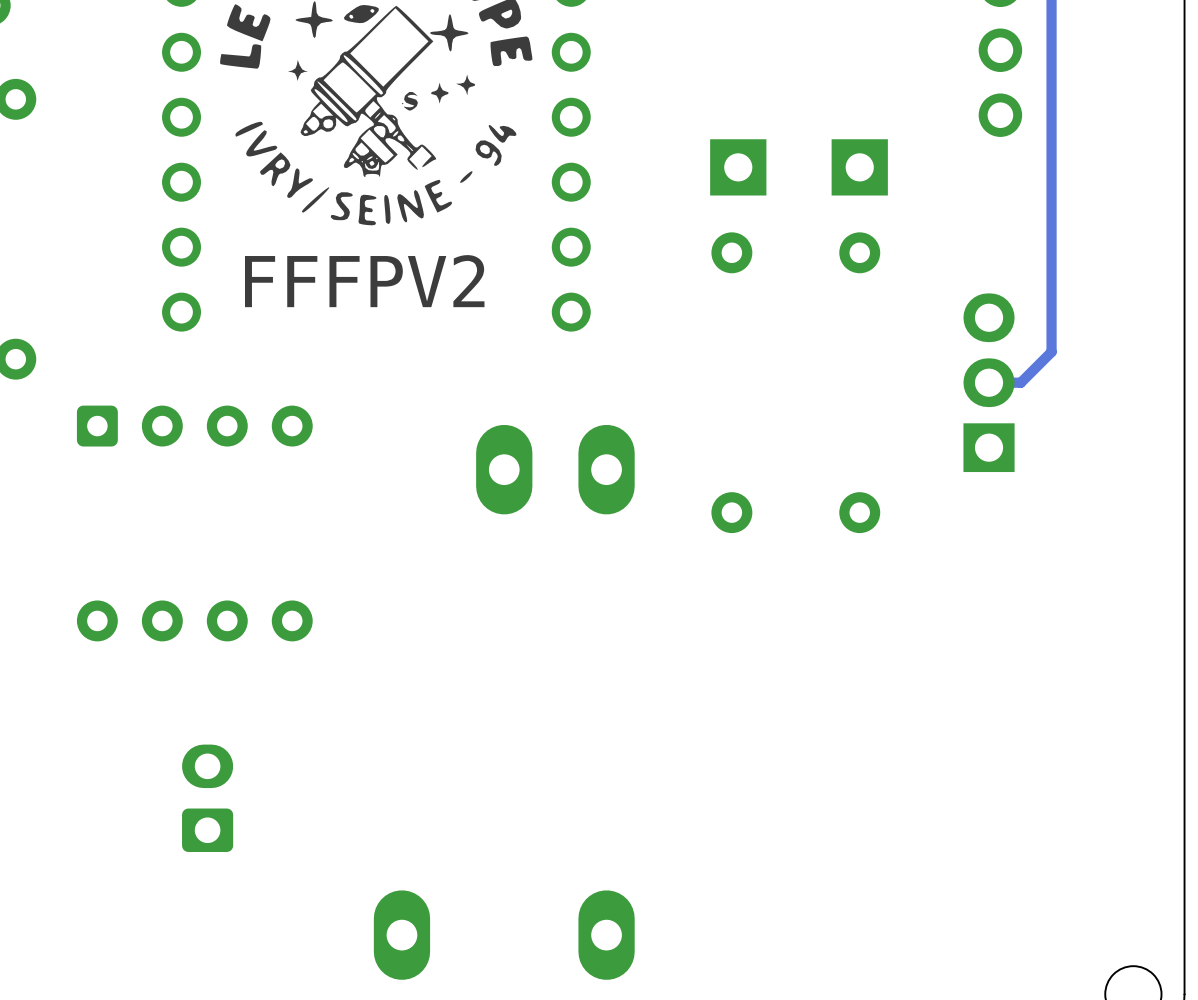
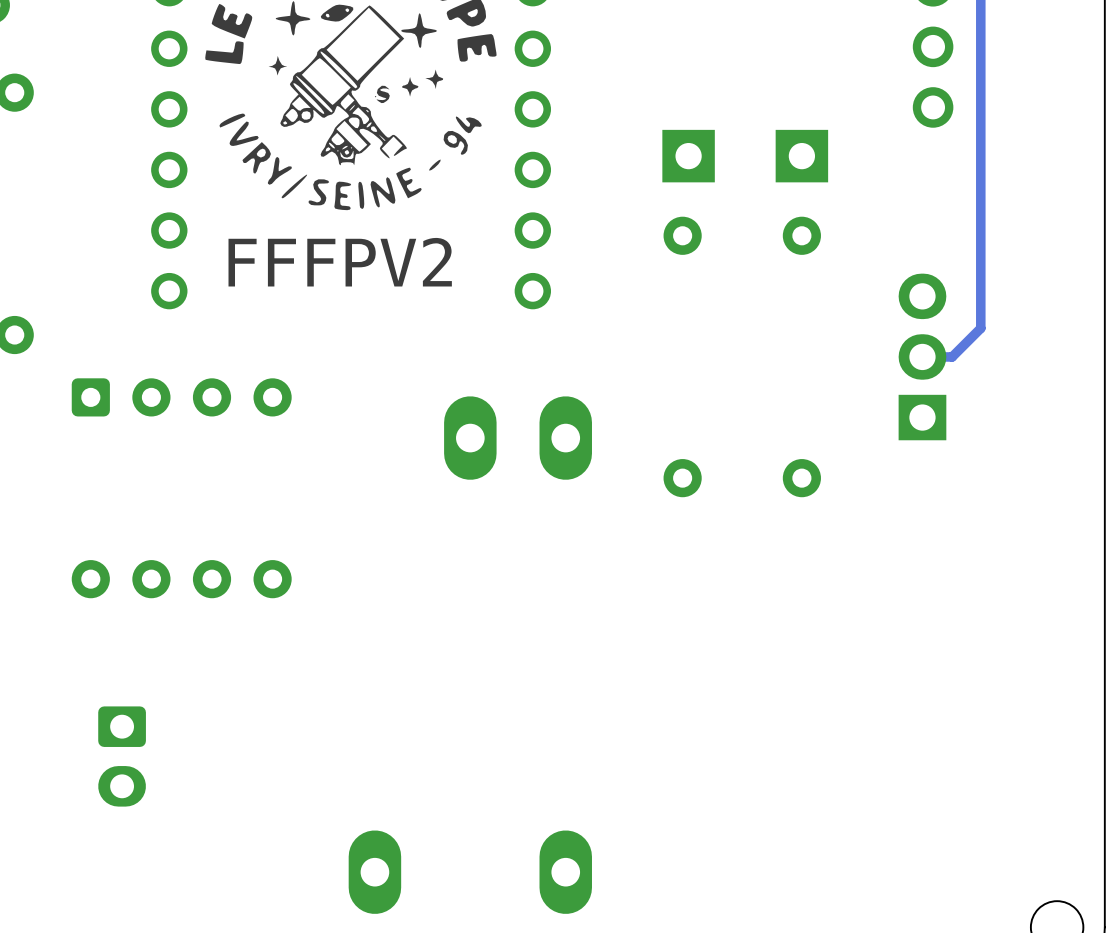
part rotation: 0° (207, 798) -> 180° (122, 756)
part position: (207, 798) -> (122, 756)

